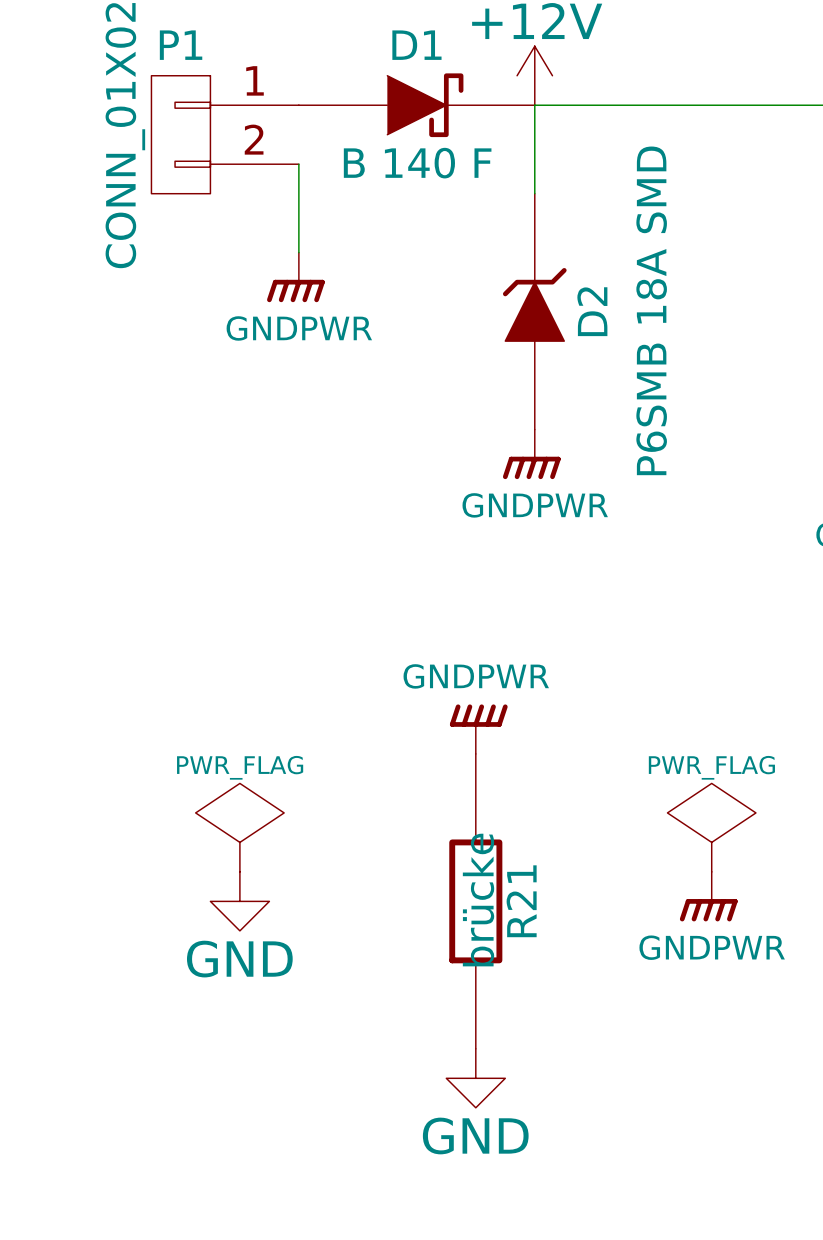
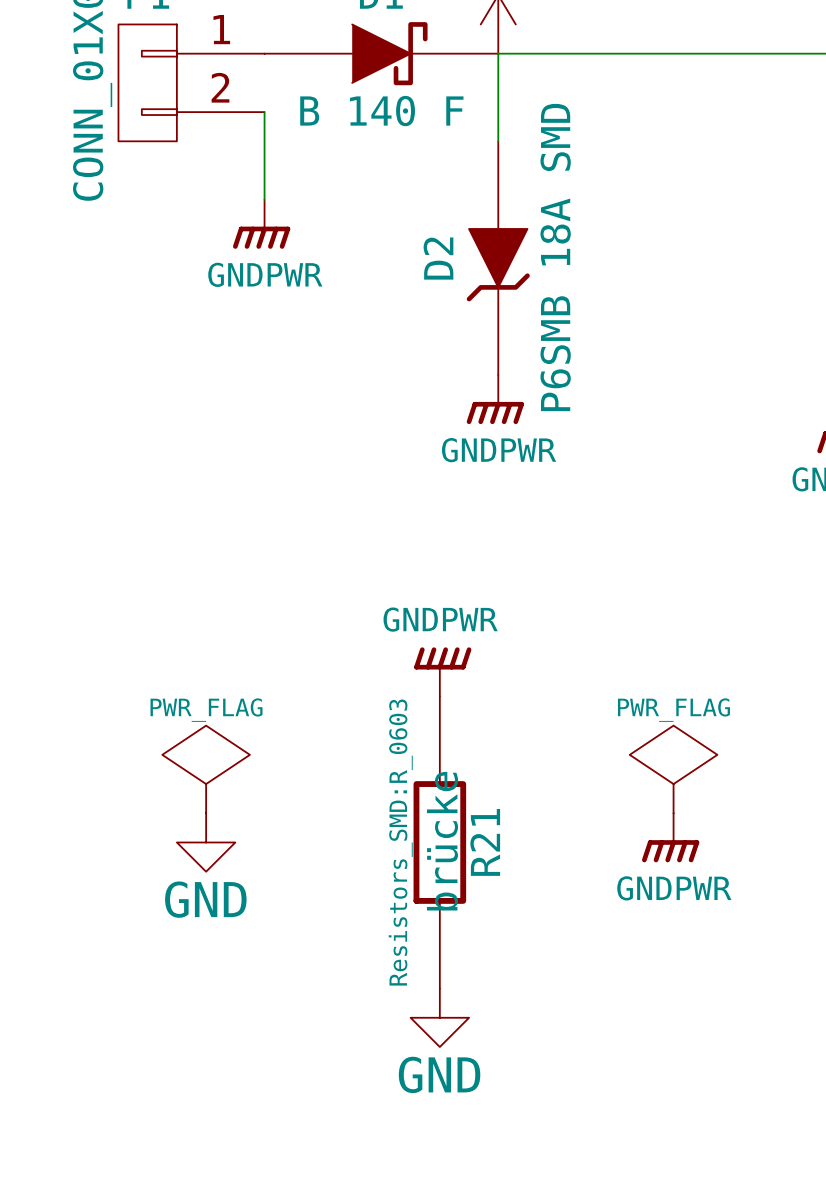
D2 rotation: 0° (534, 304) -> 180° (498, 265)
D2 value position: P6SMB 18A SMD (651, 310) -> P6SMB 18A SMD (555, 257)
R21 text: none -> Resistors_SMD:R_0603 (400, 842)

